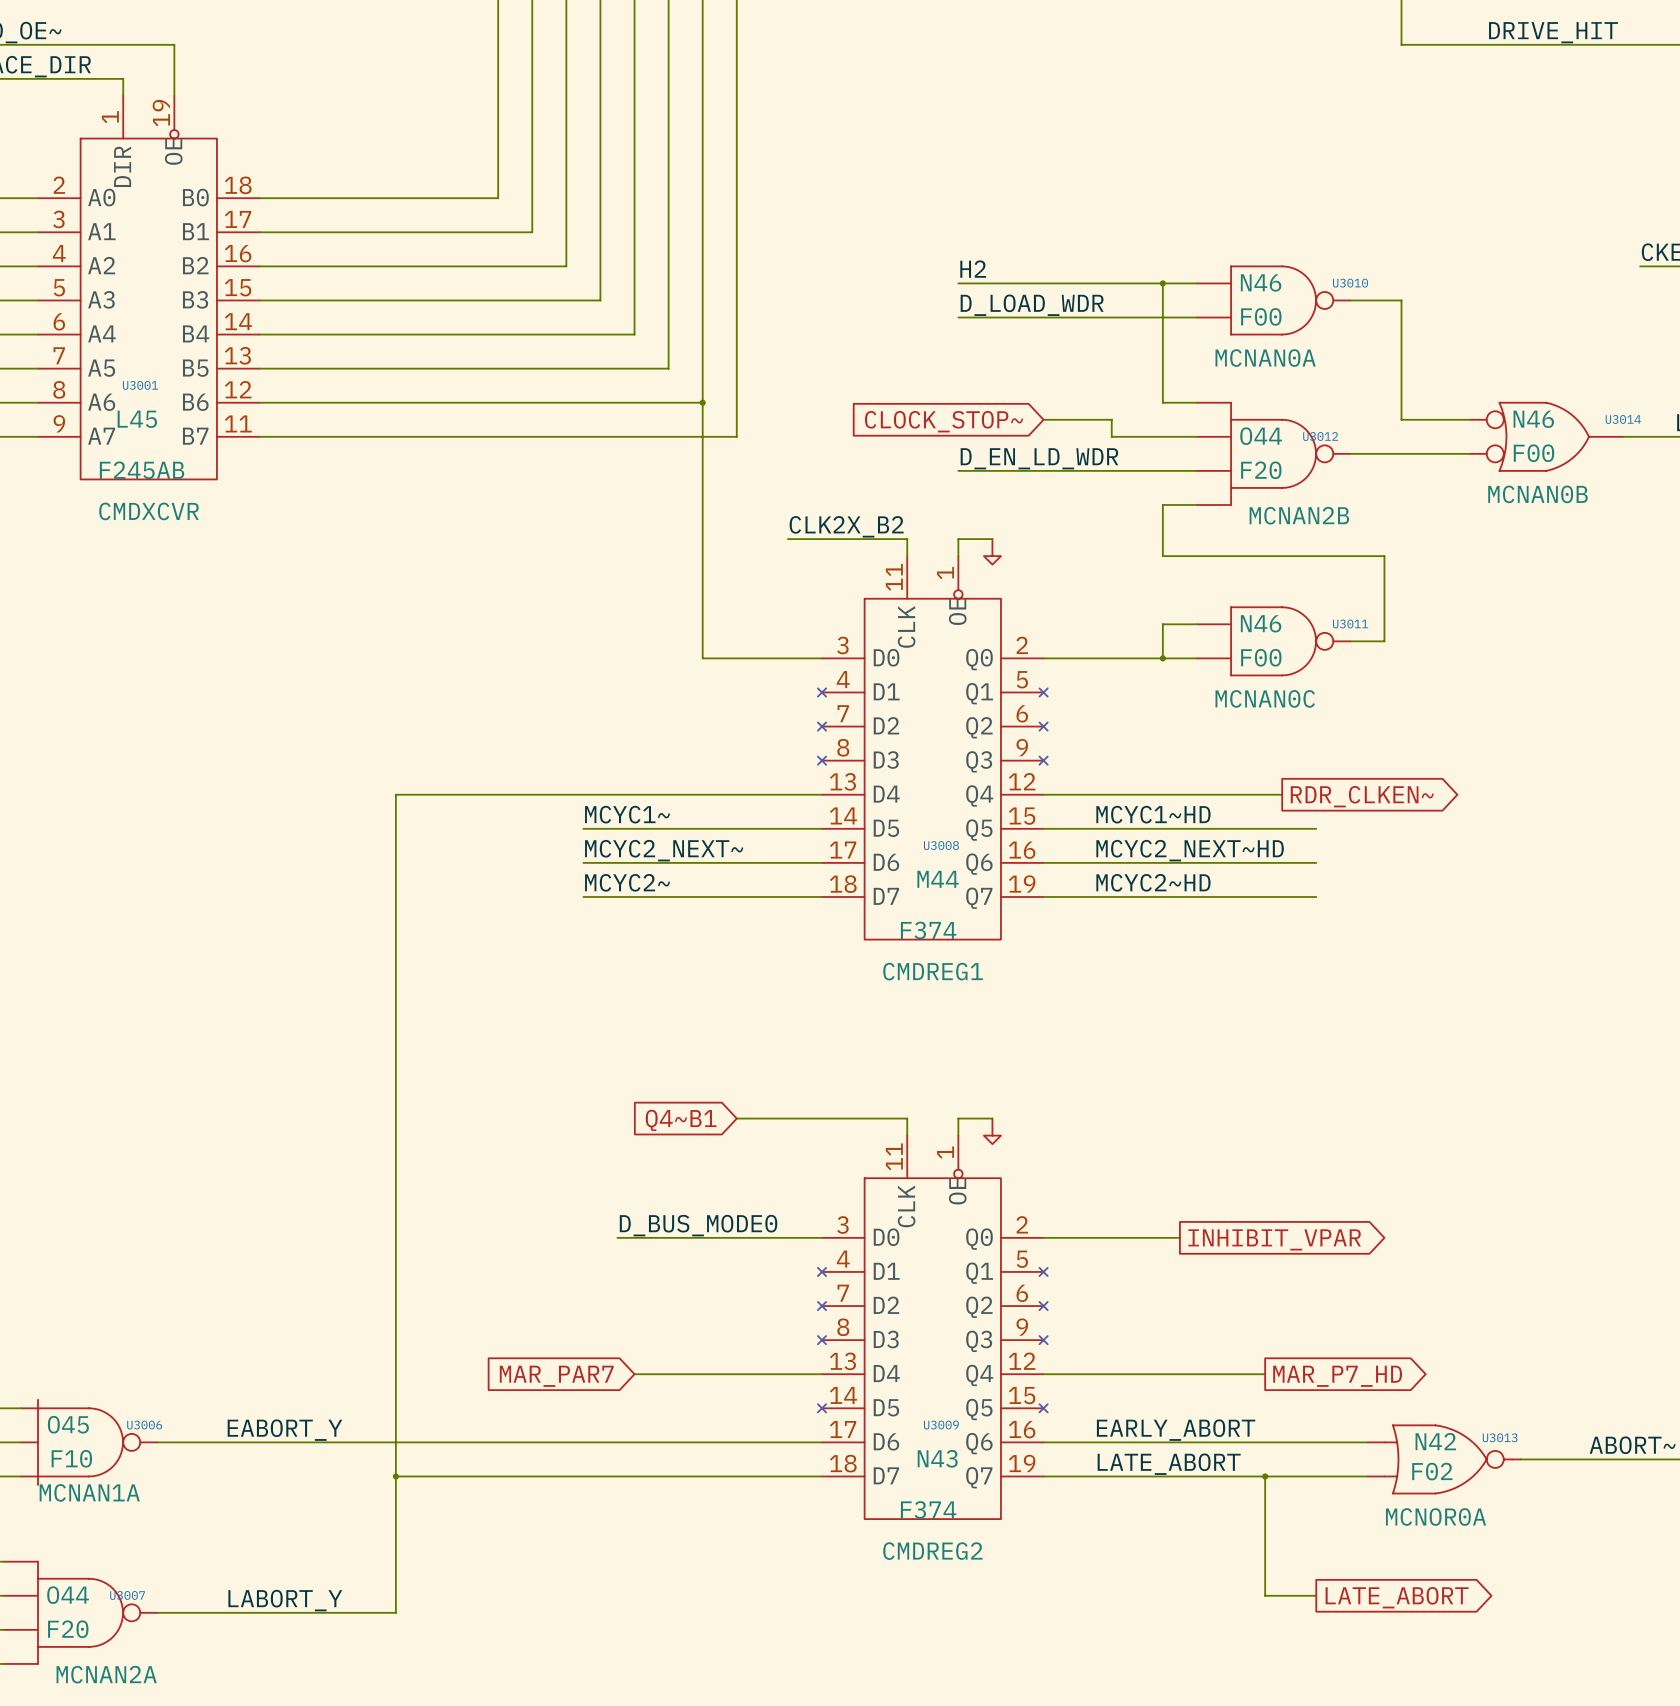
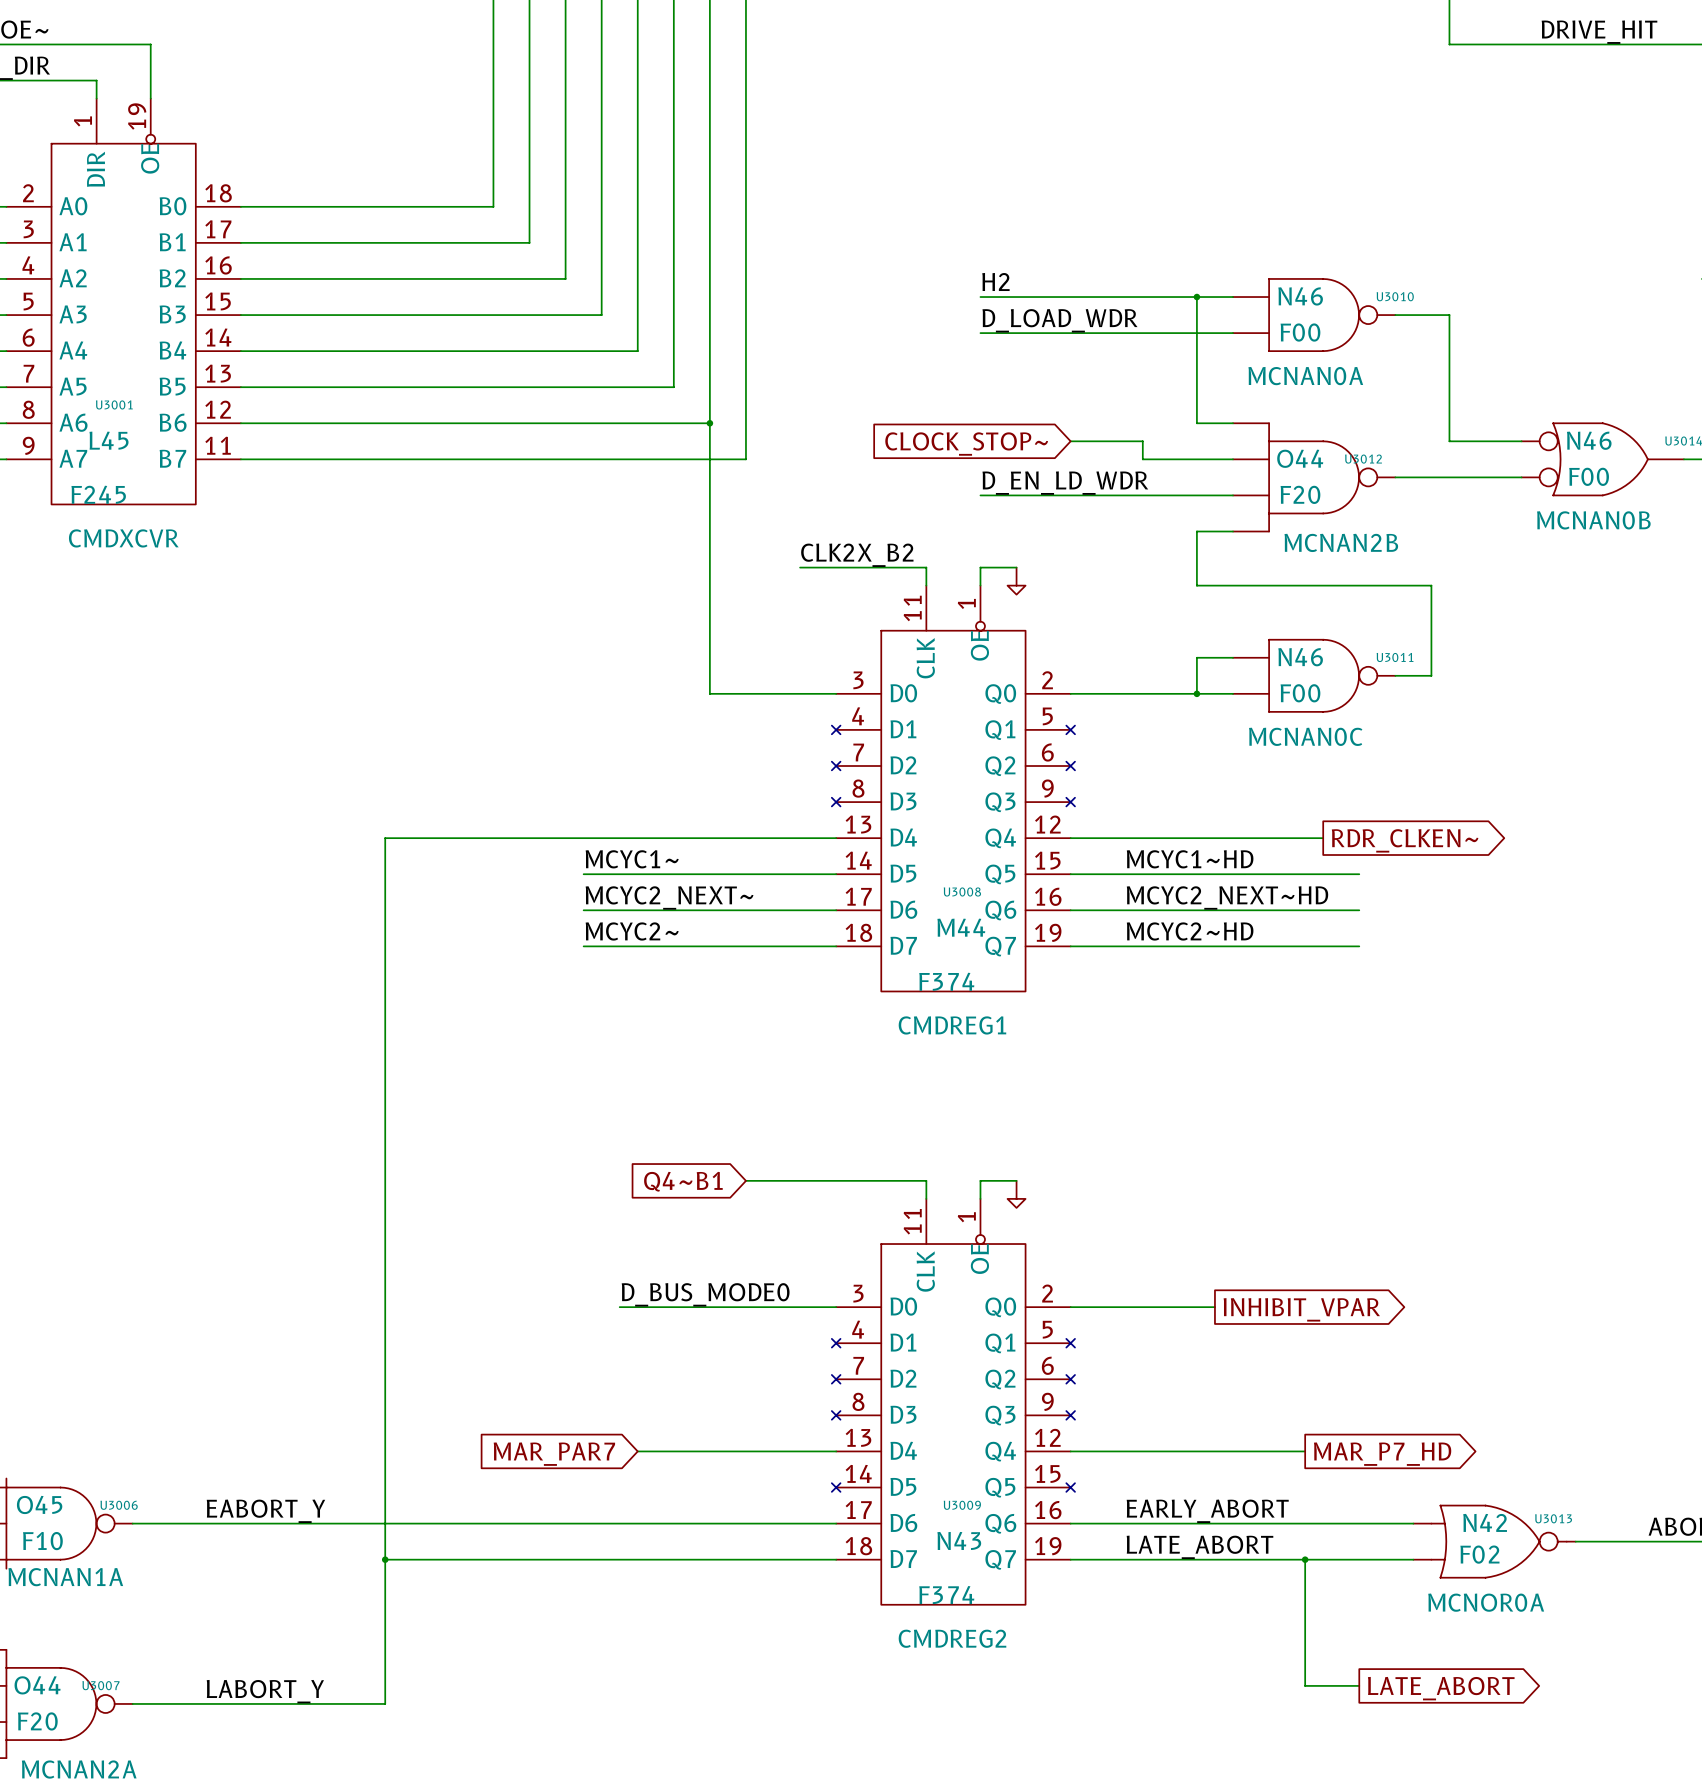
U3001 value: F245AB (142, 470) -> F245 (98, 494)

